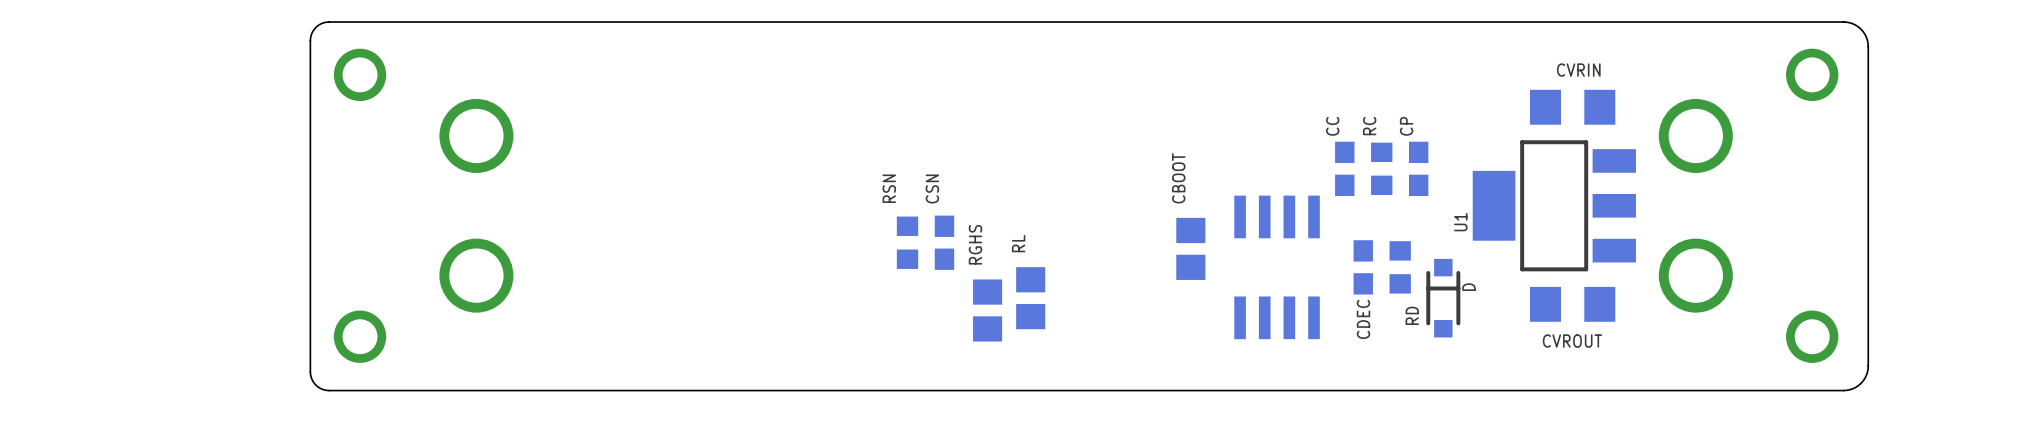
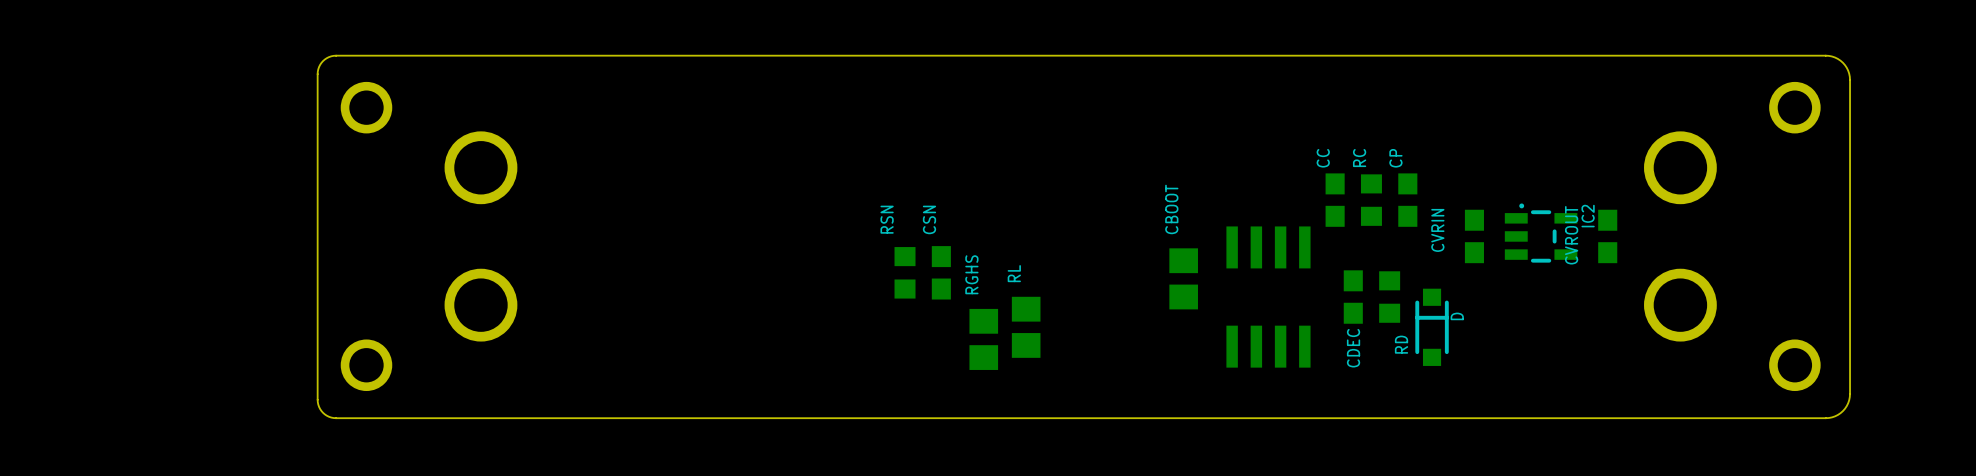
CVRIN: (1572, 107) -> none
IC2: none -> (1541, 233)
CVRIN: none -> (1474, 236)
U1: (1554, 205) -> none
CVROUT: none -> (1607, 236)
CVROUT: (1572, 304) -> none

